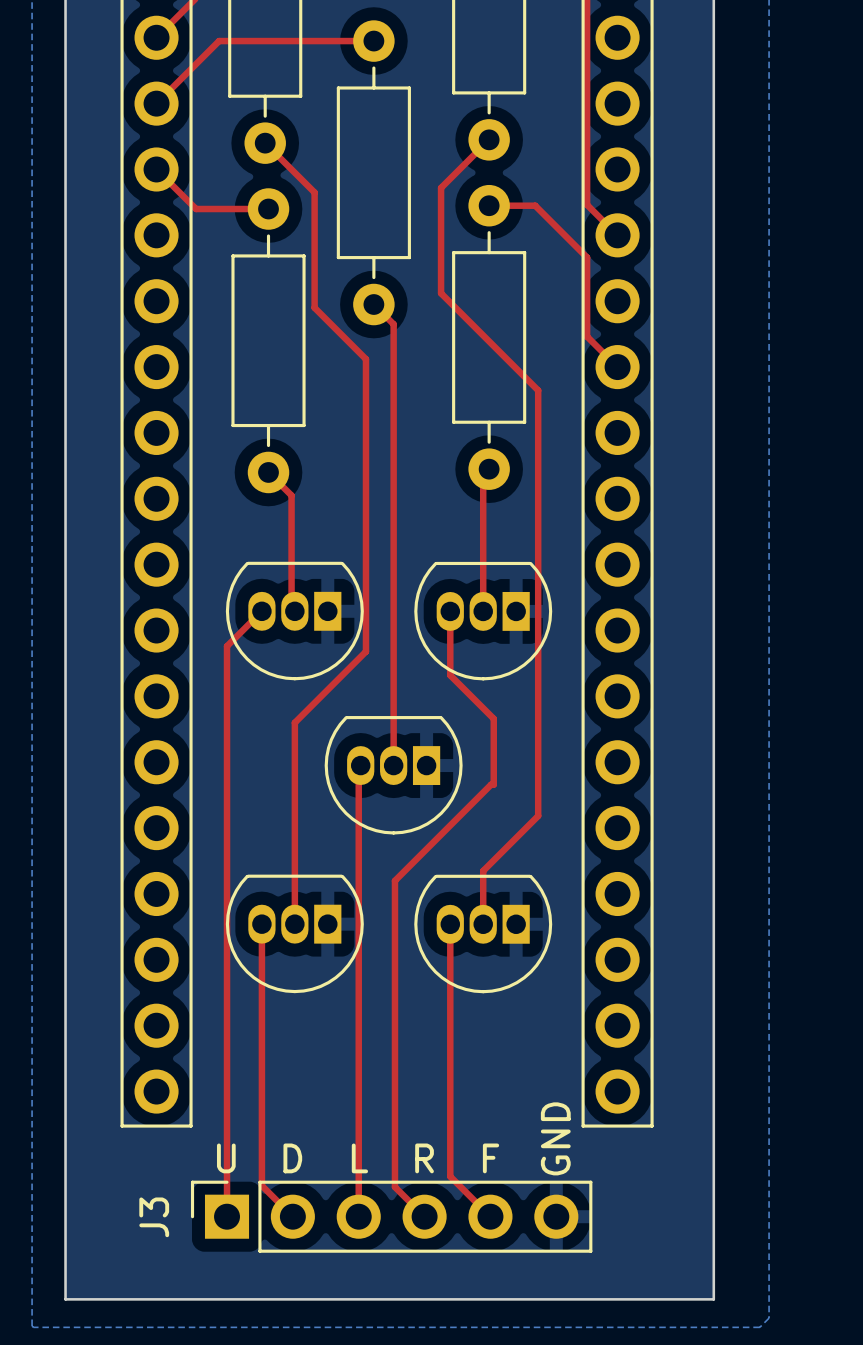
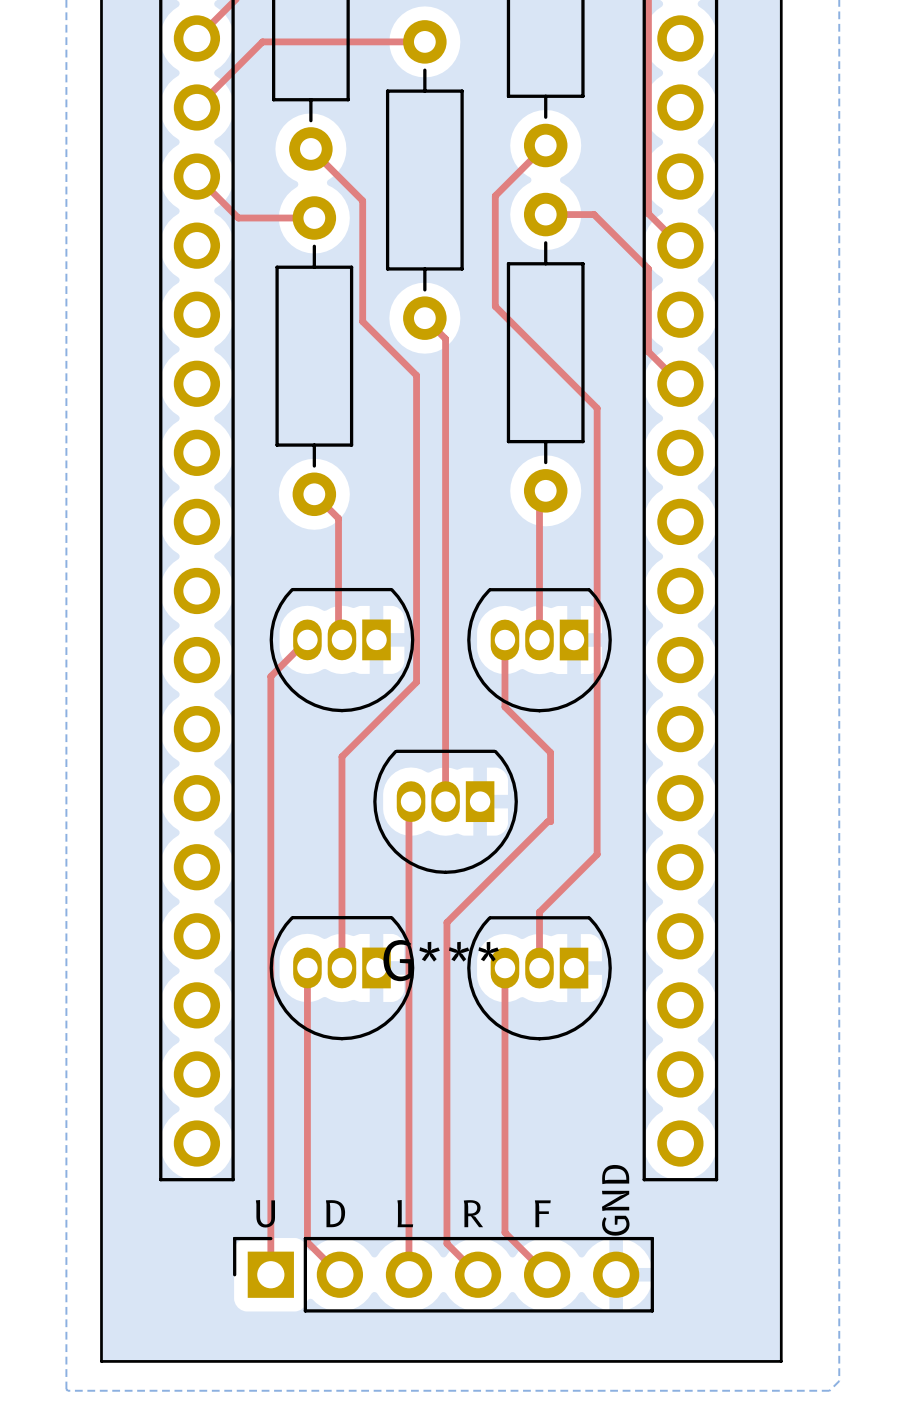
G***: none -> (441, 960)
J3 name: J3 (154, 1217) -> none

